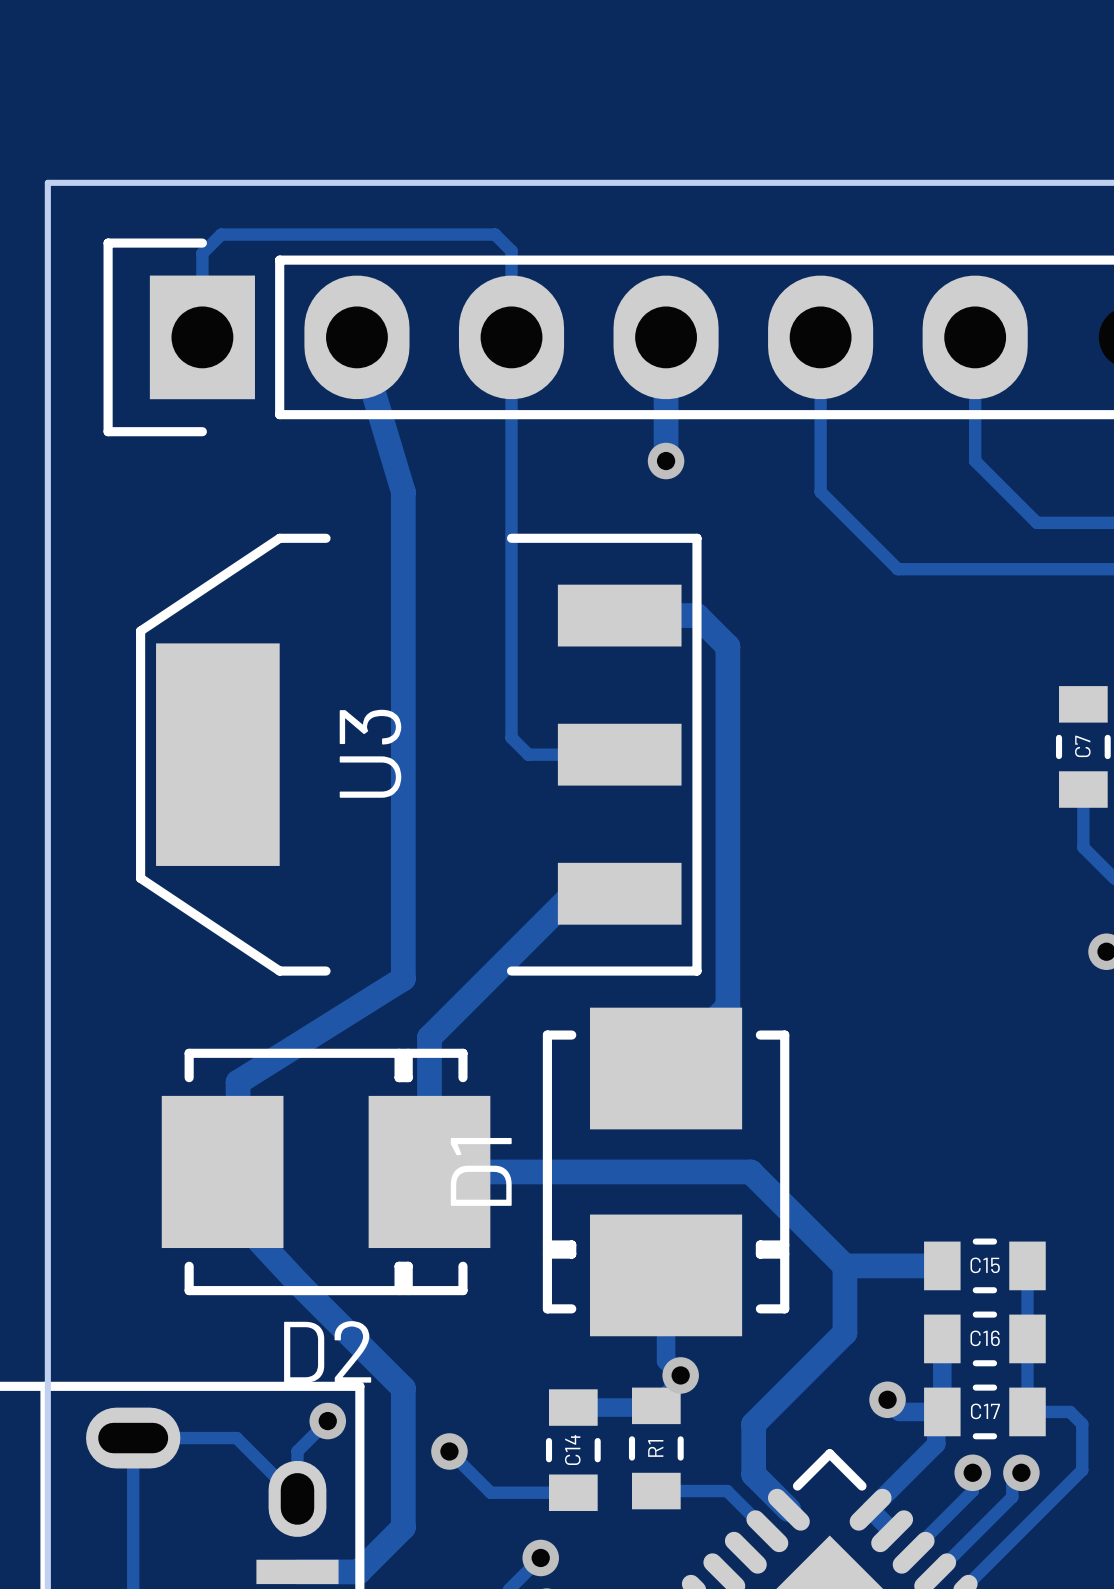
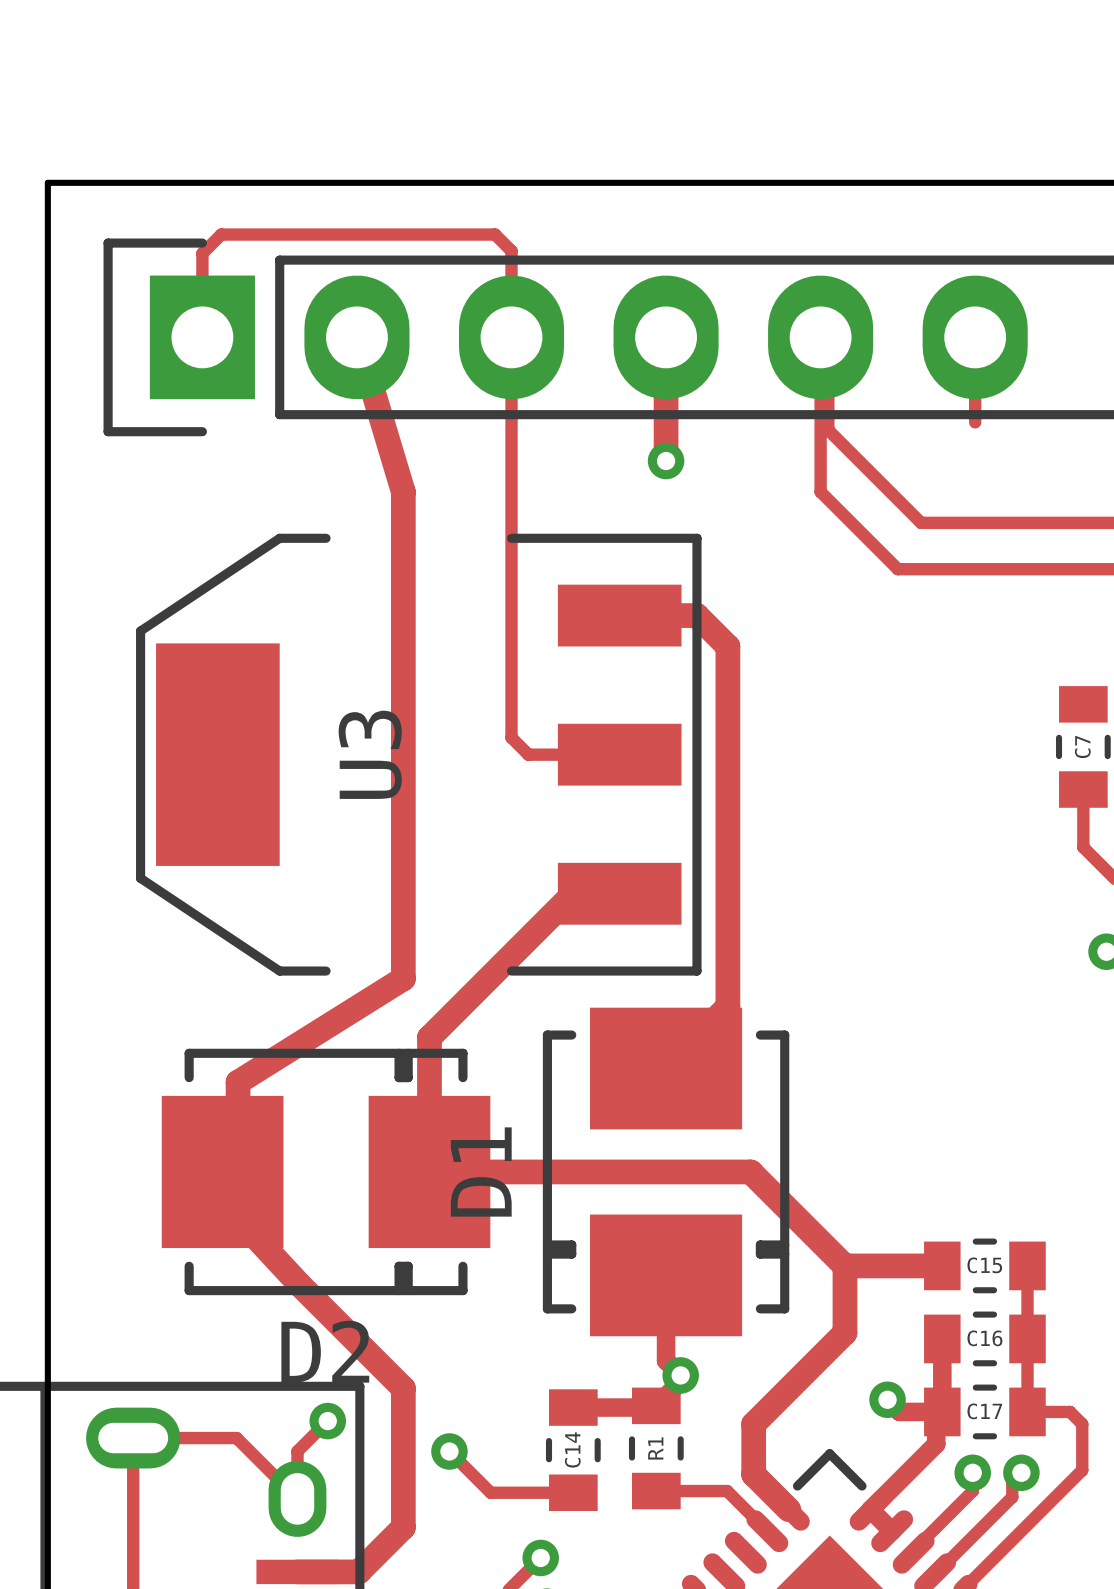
track: (975, 422) (975, 461) (1036, 522) -> (820, 337) (828, 345) (828, 430) (921, 522) (1036, 522)

